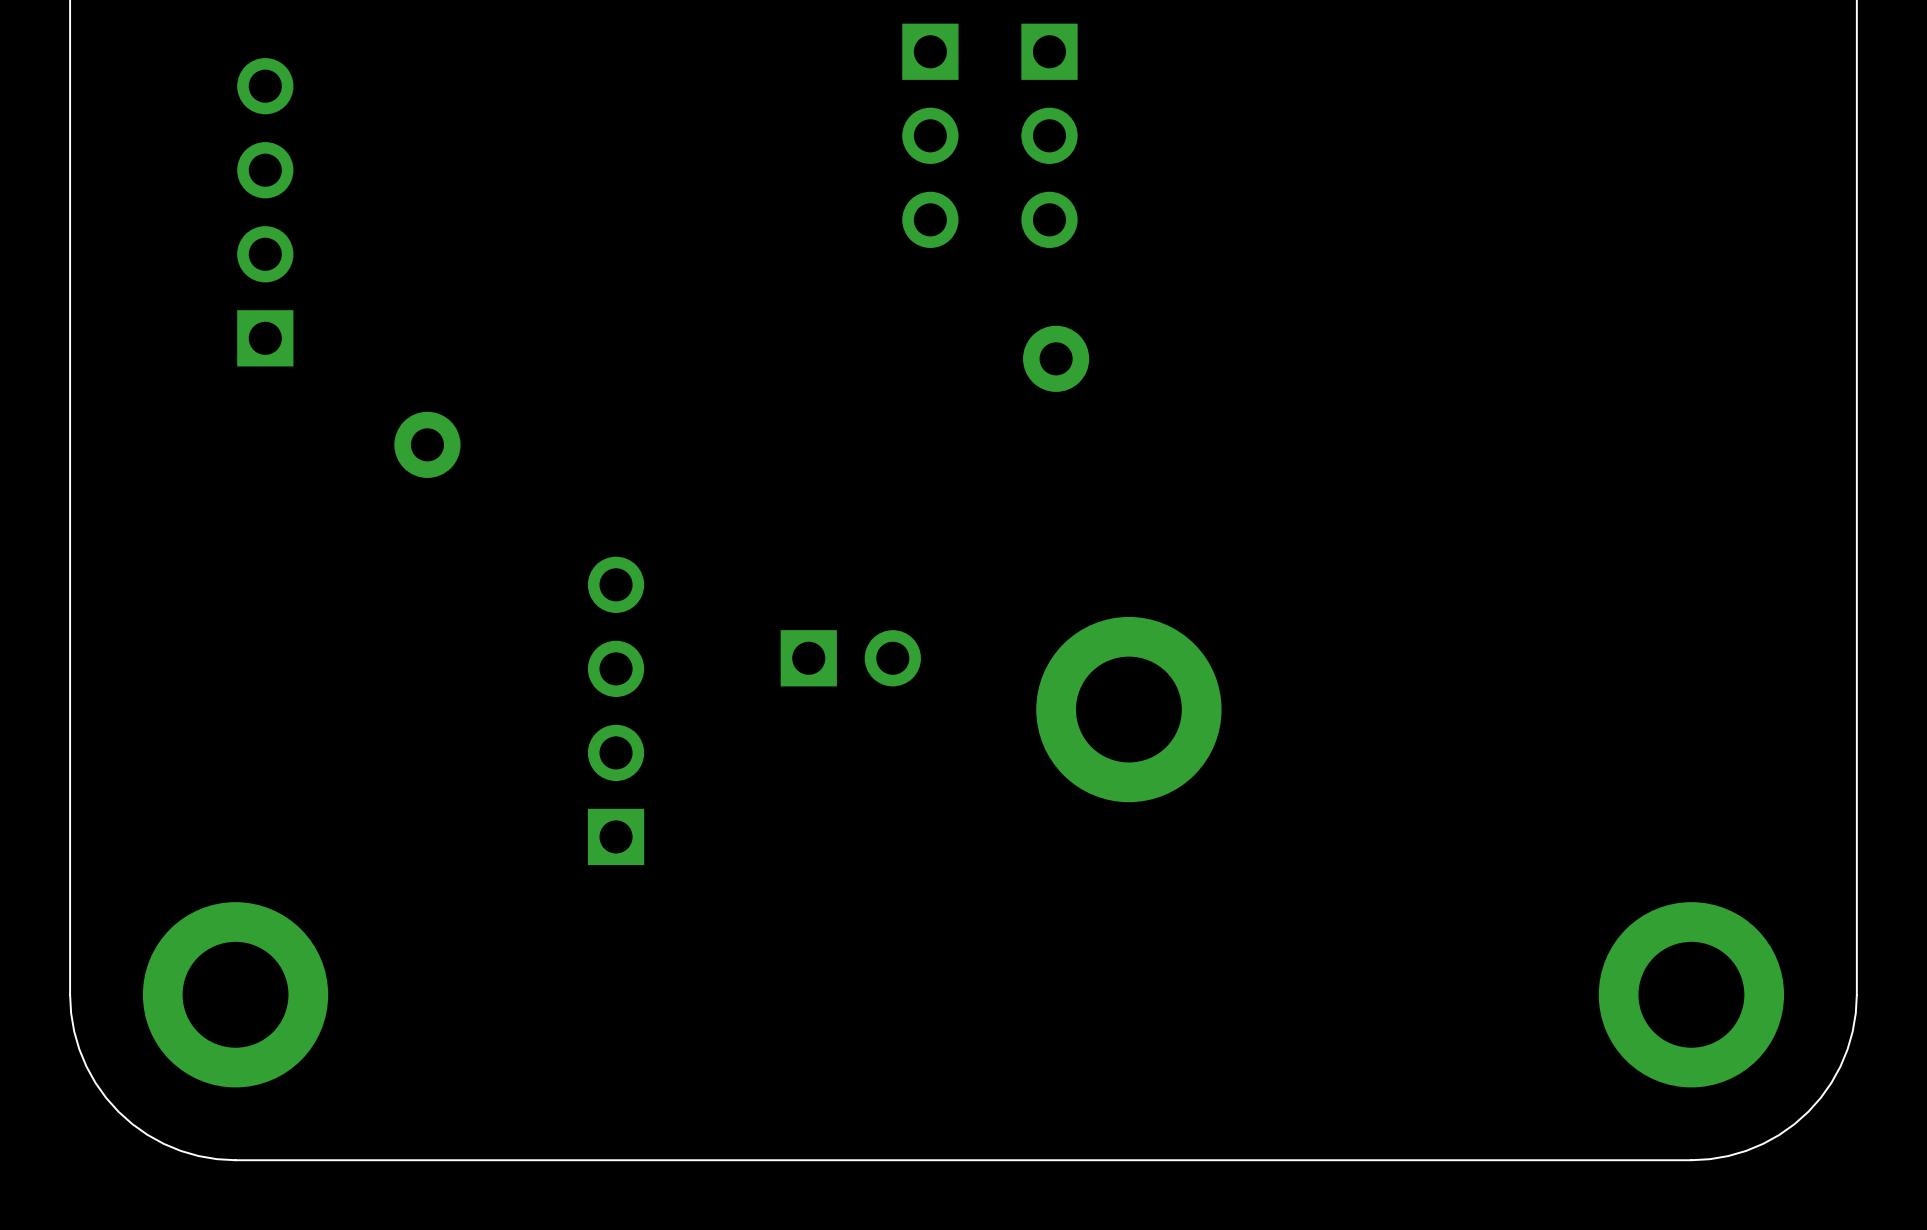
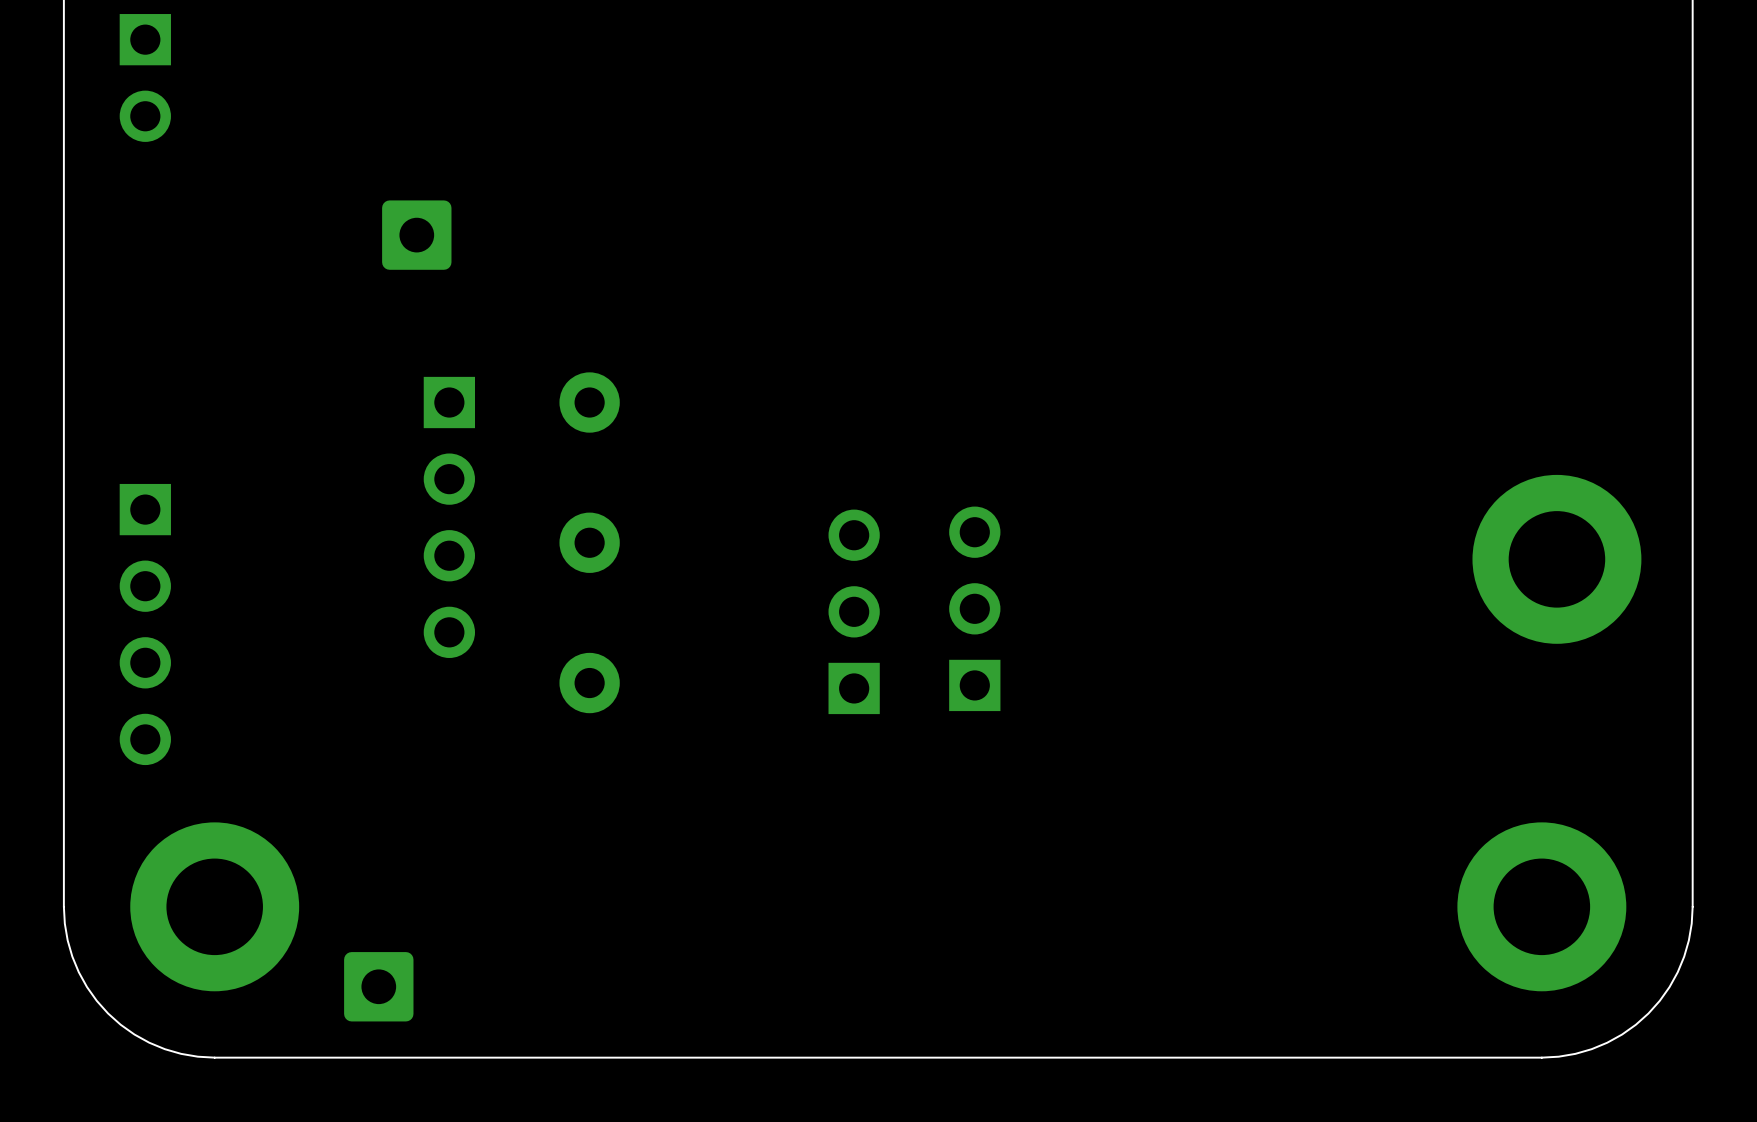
part: none -> (145, 77)
part: (930, 135) -> none
part: (1049, 135) -> none
part: (265, 212) -> none
part: none -> (416, 235)
part: (1056, 358) -> none
part: none -> (589, 402)
part: (427, 444) -> none
part: none -> (589, 542)
part: (850, 658) -> none
part: none -> (974, 608)
part: none -> (854, 611)
part: none -> (145, 624)
part position: (1128, 709) -> (1556, 559)
part rotation: 0° (616, 710) -> 180° (449, 517)
part position: (616, 710) -> (449, 517)
part: none -> (589, 683)
part: none -> (378, 986)

